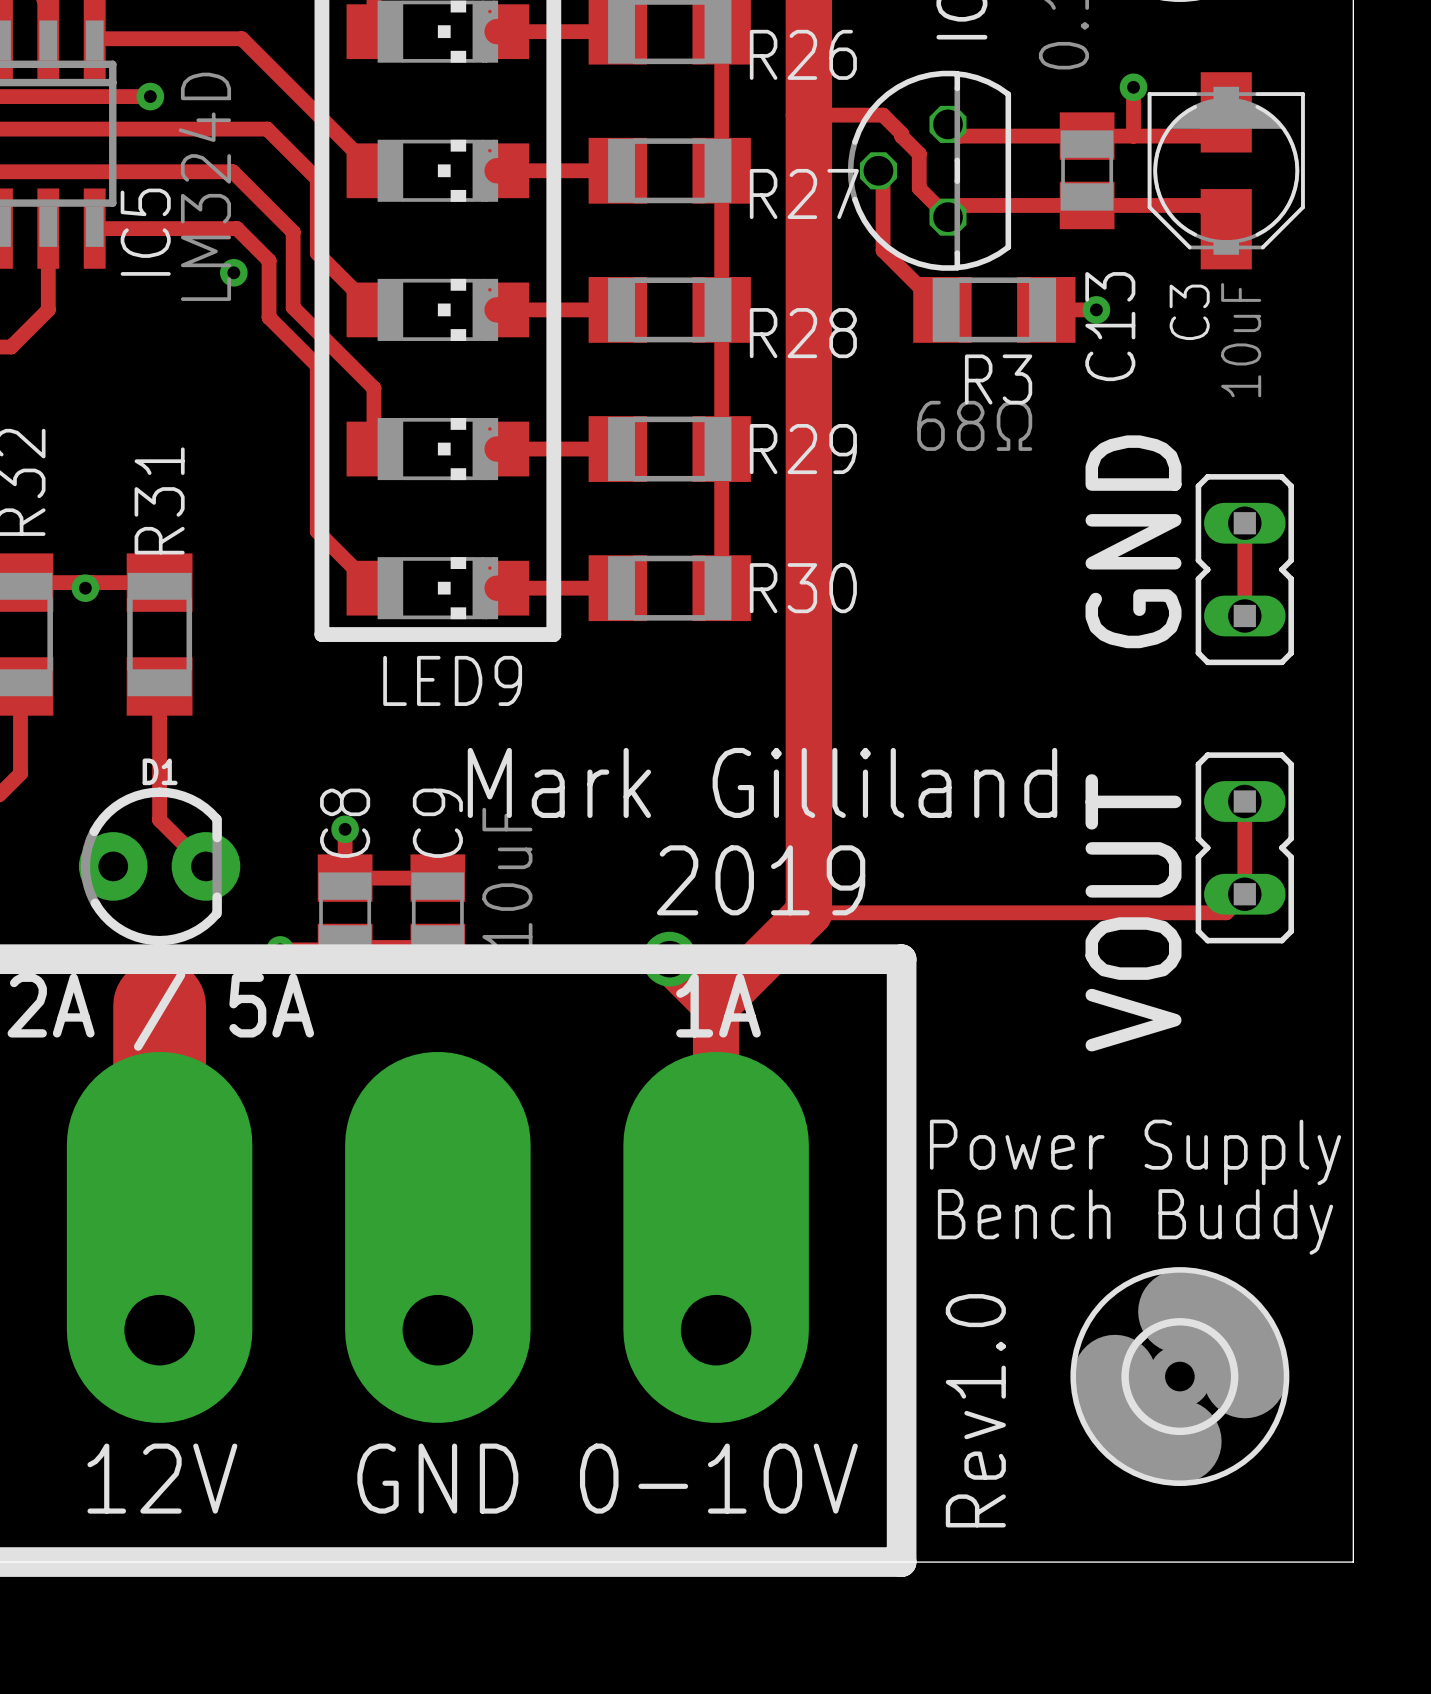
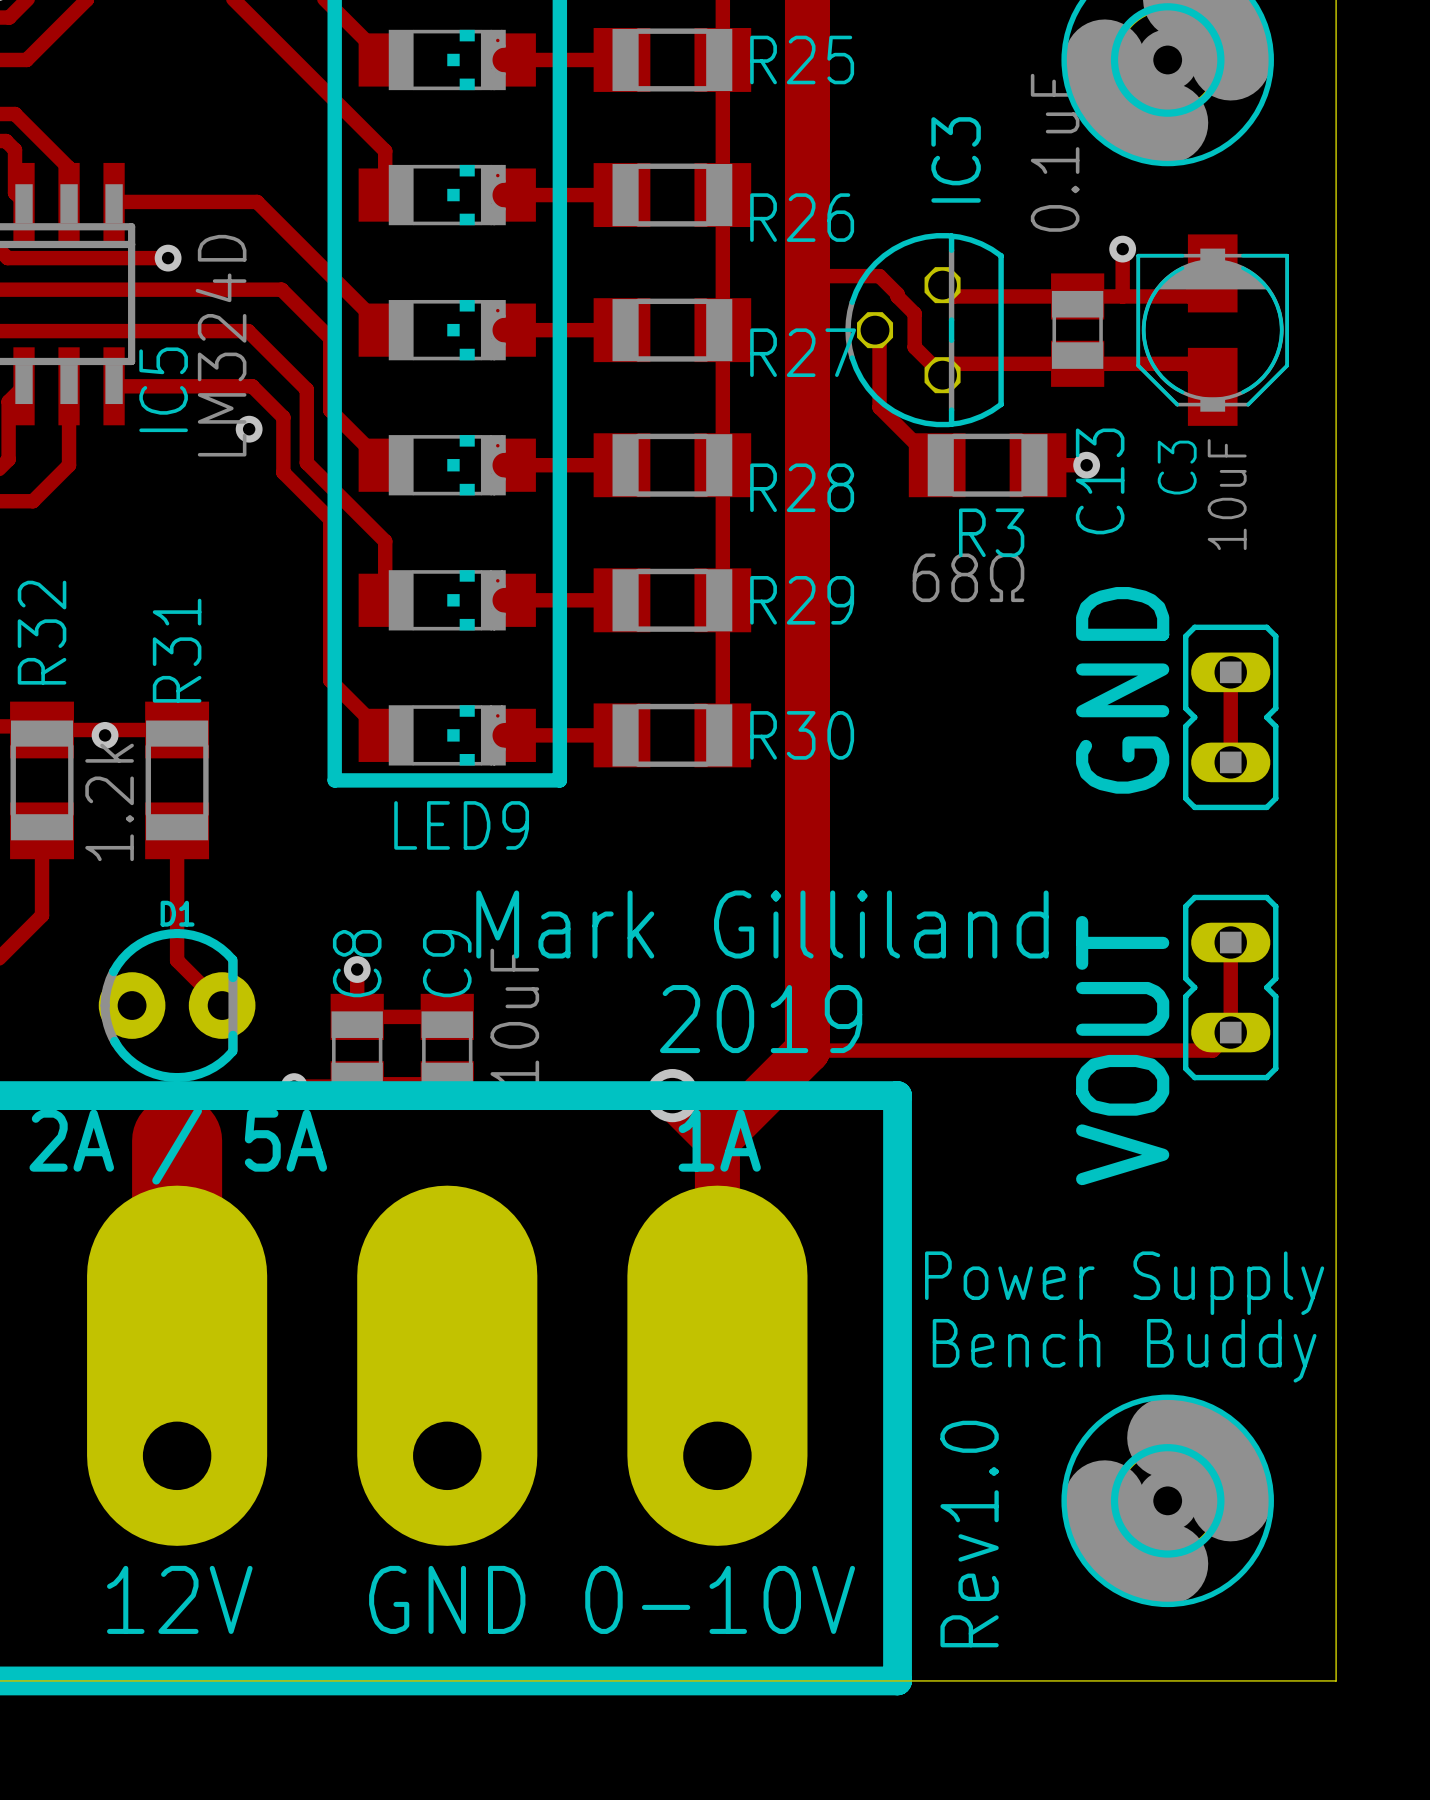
R31 value: none -> 1.2k (109, 802)

